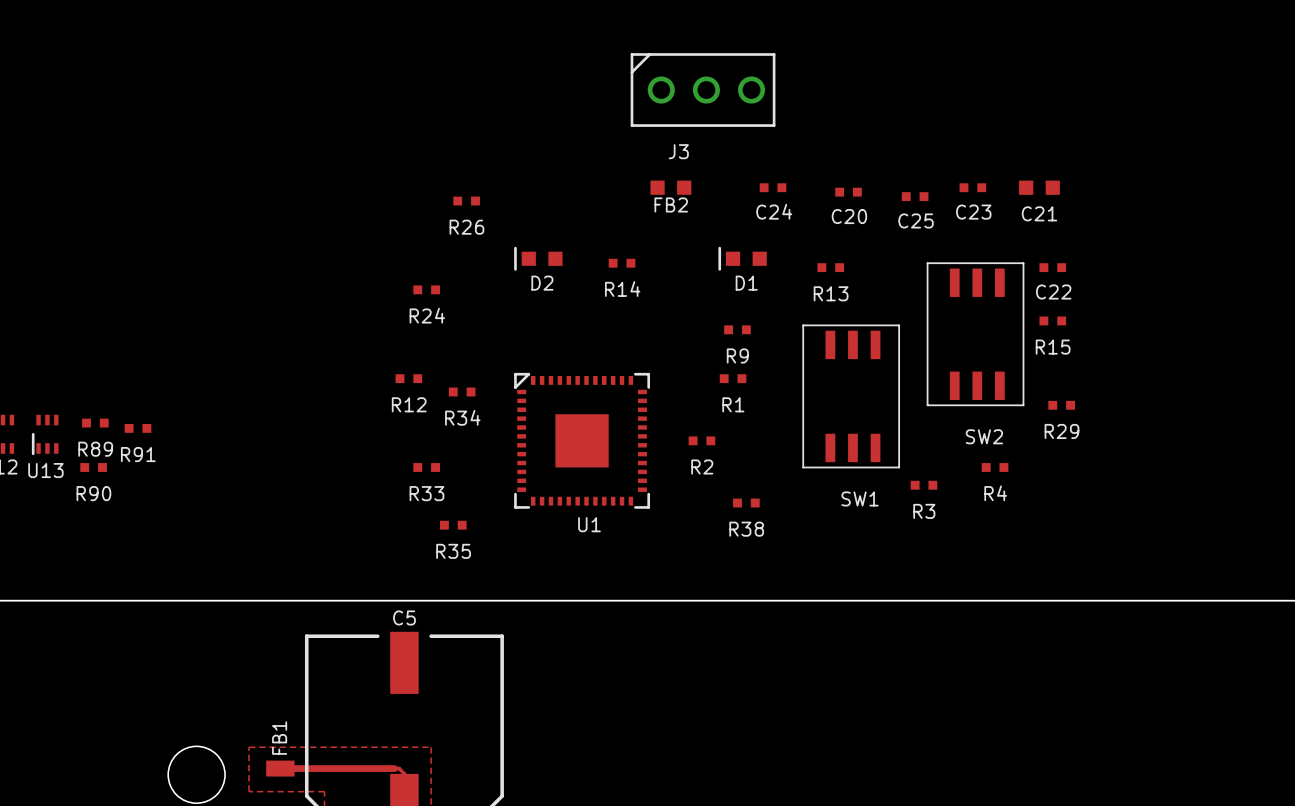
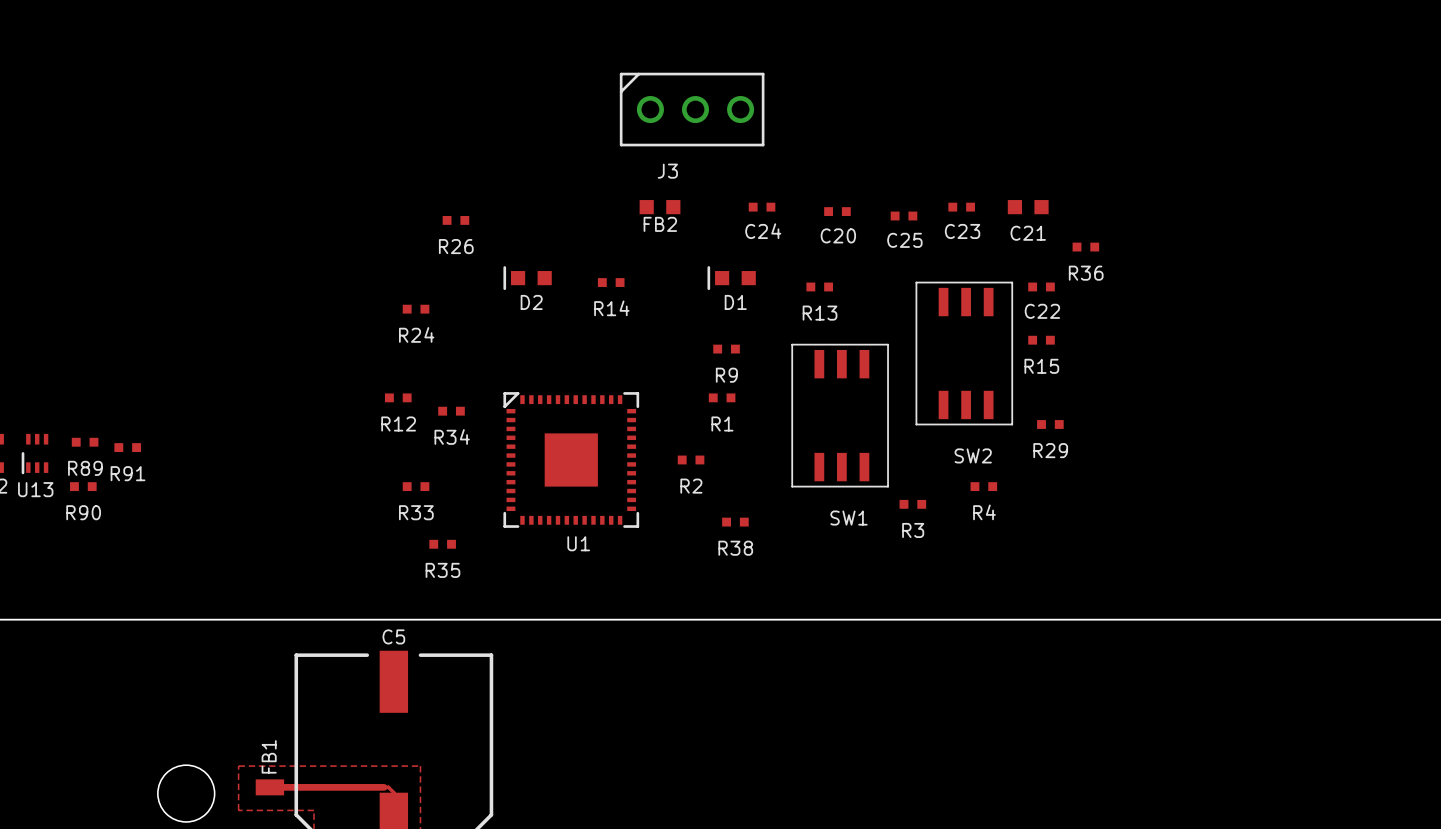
R36: none -> (1085, 247)

